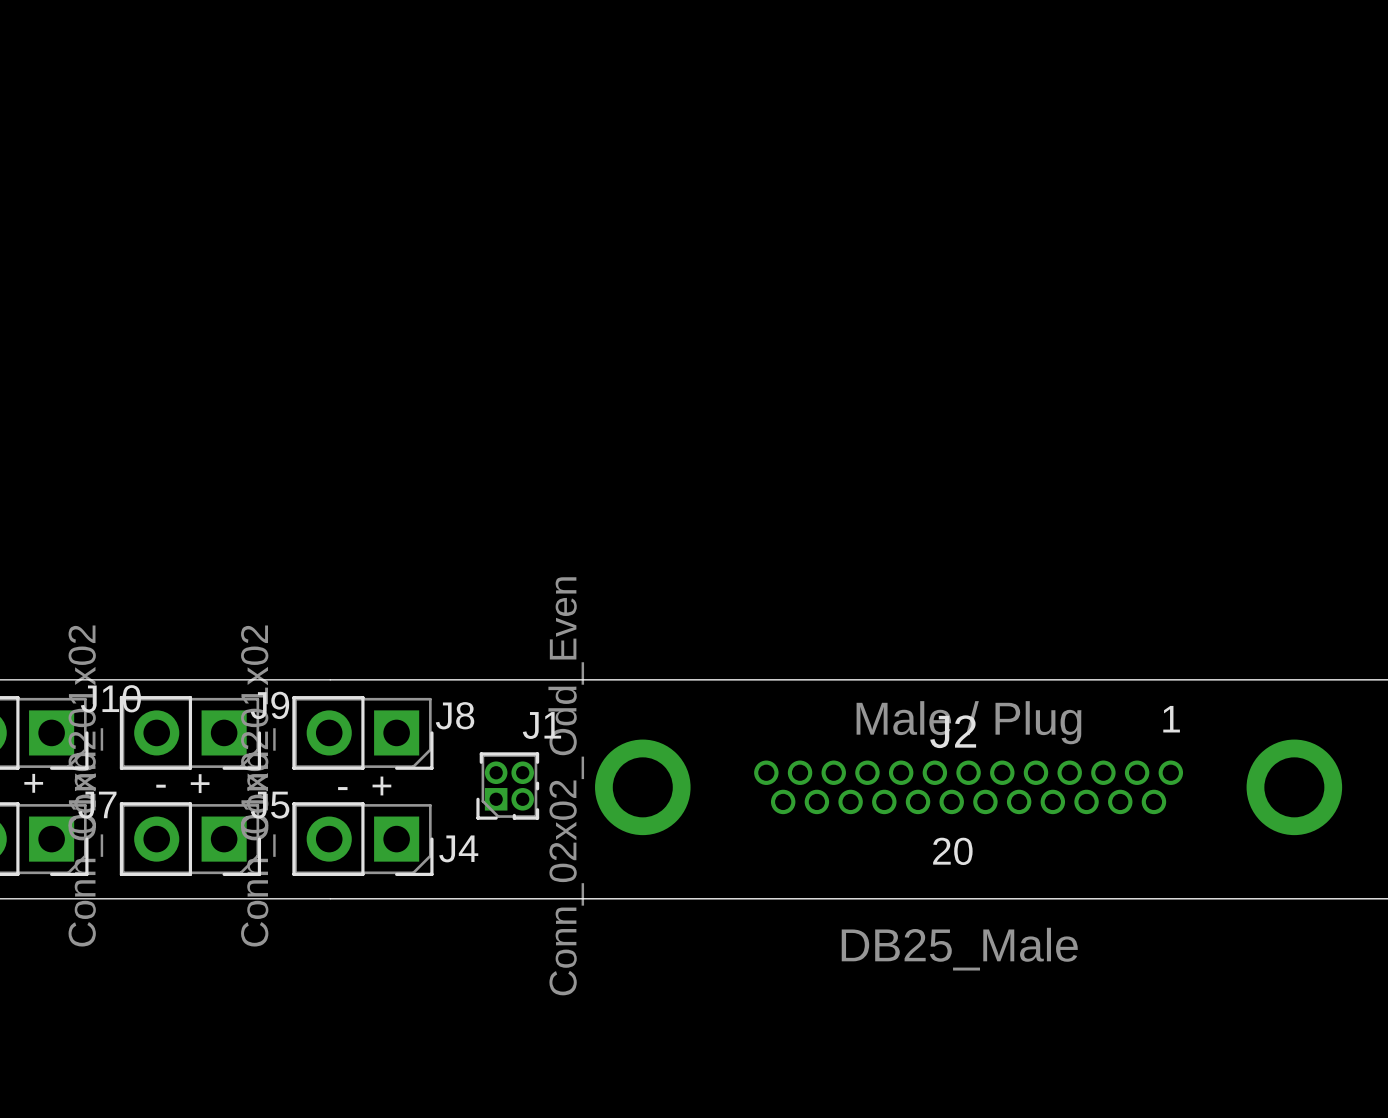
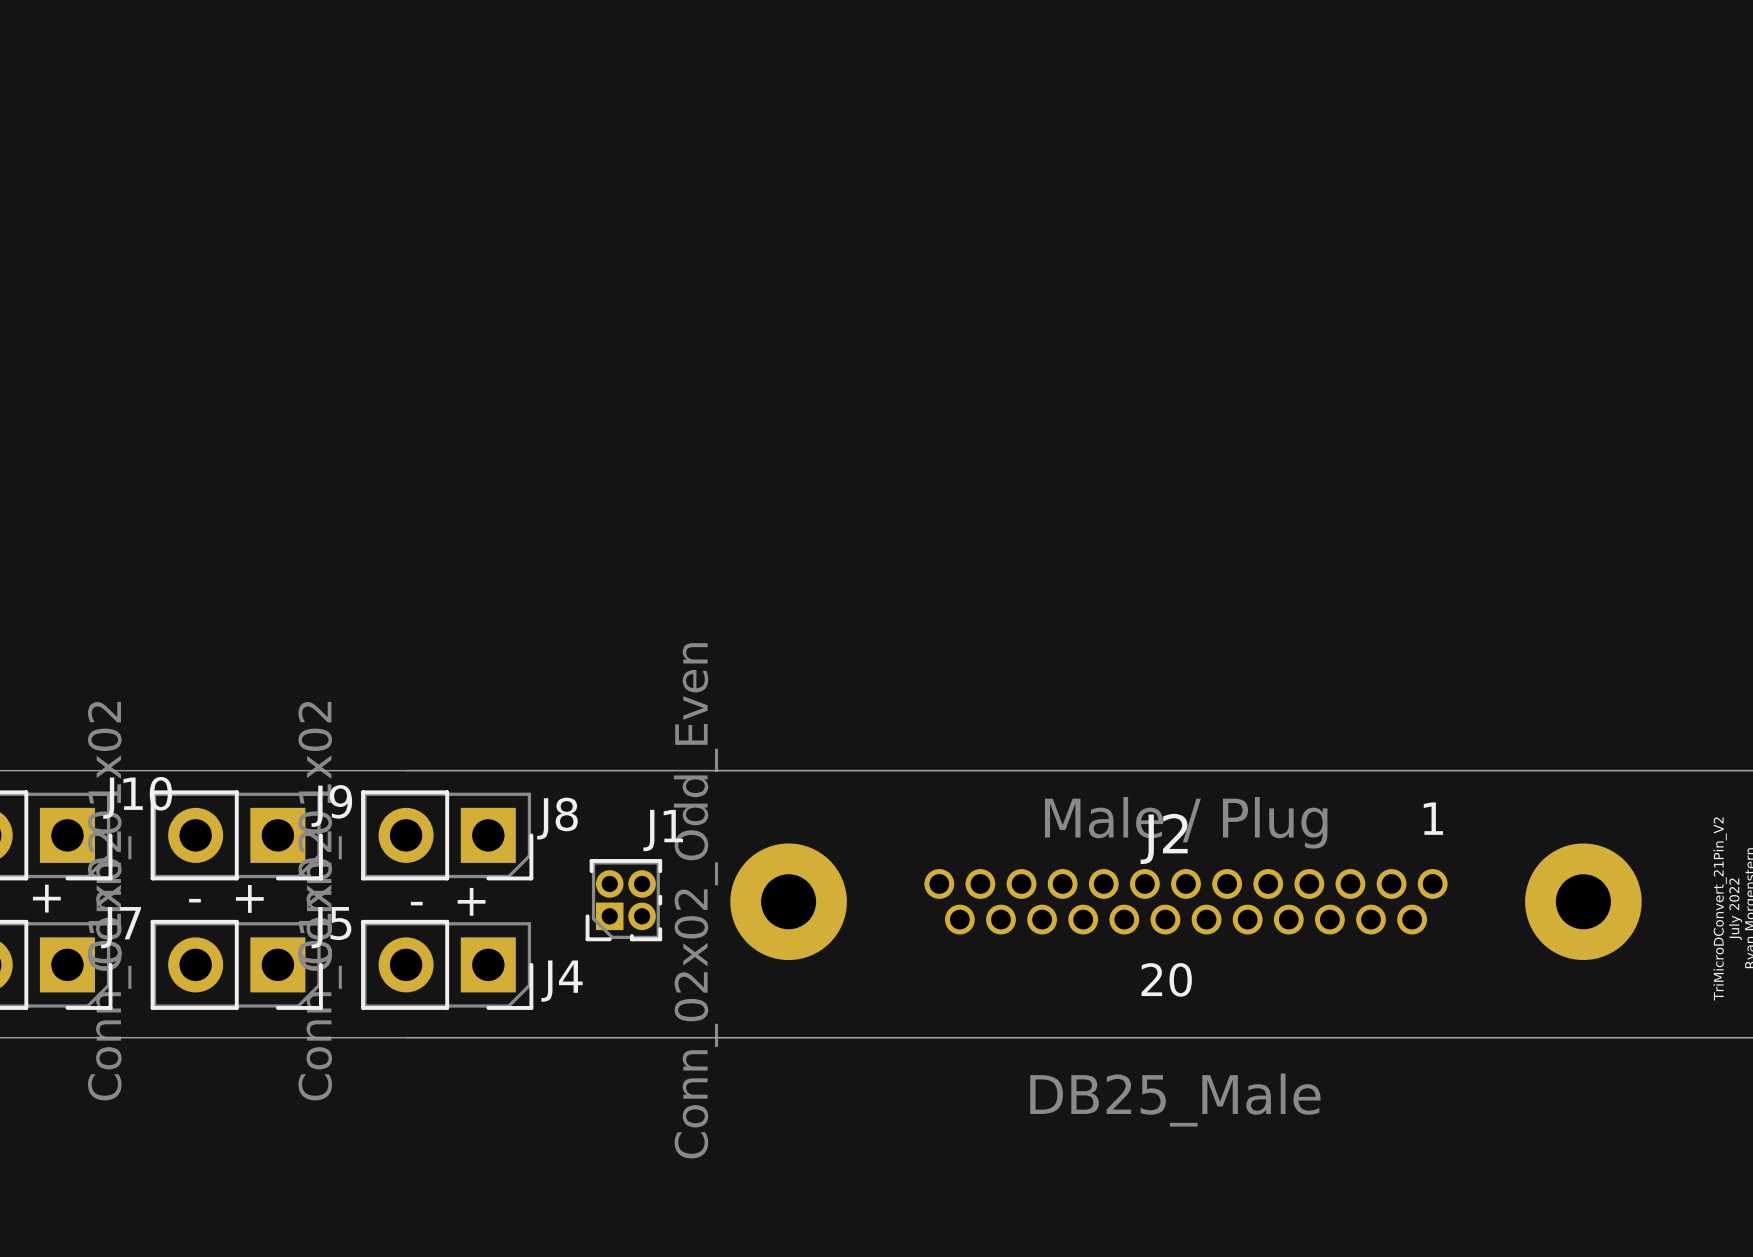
J2 footprint: [595, 739, 1343, 836] -> [730, 843, 1642, 961]

